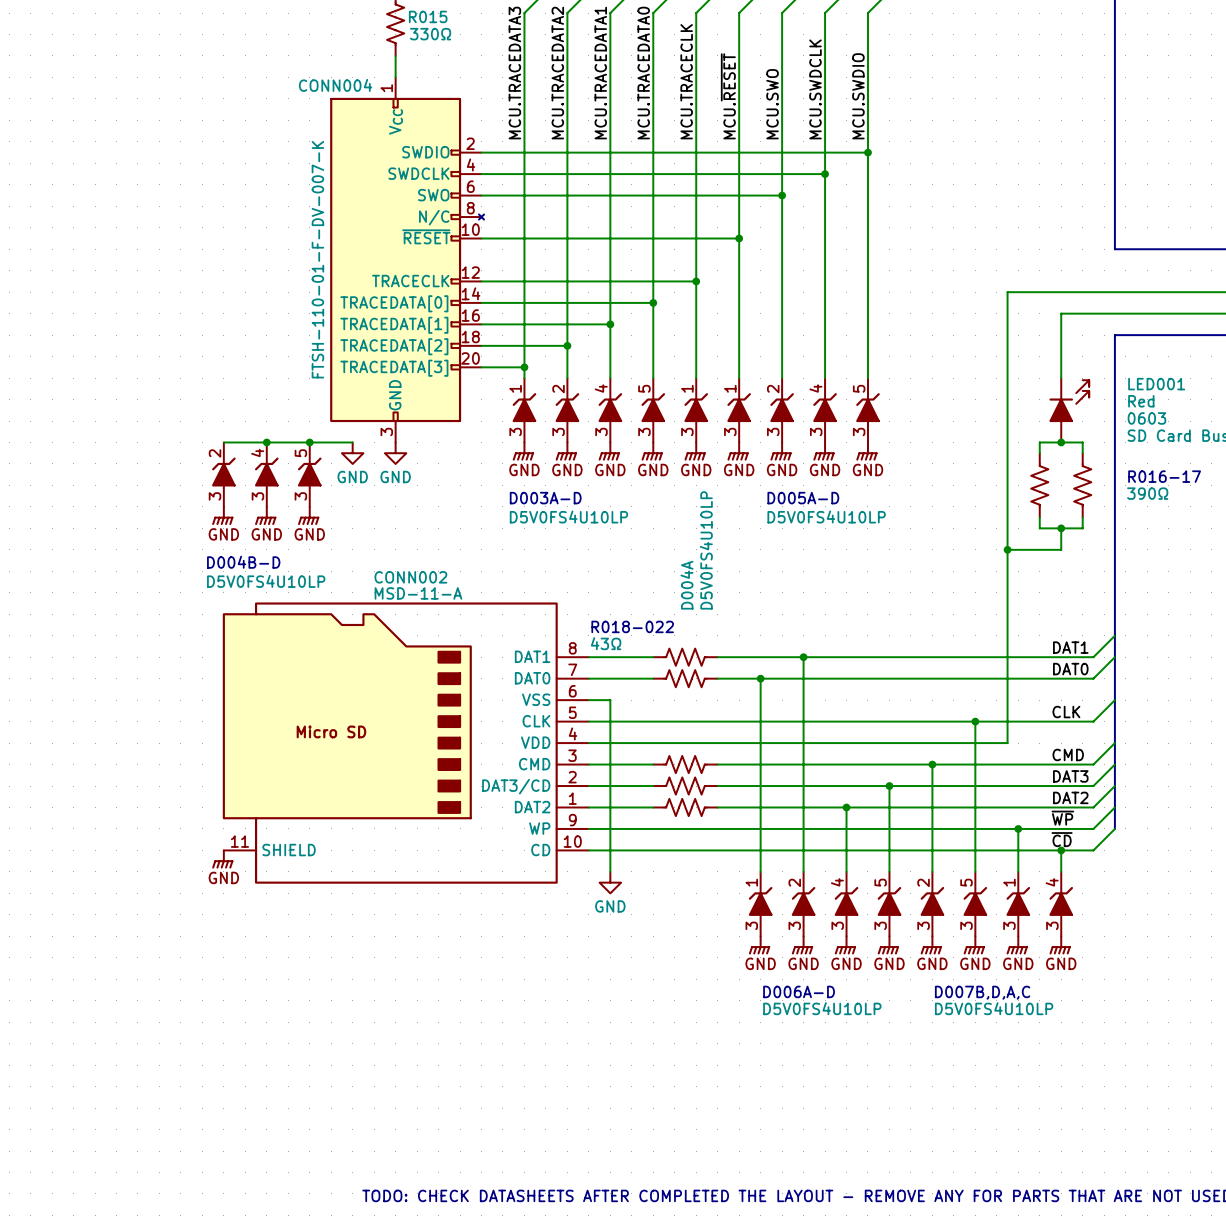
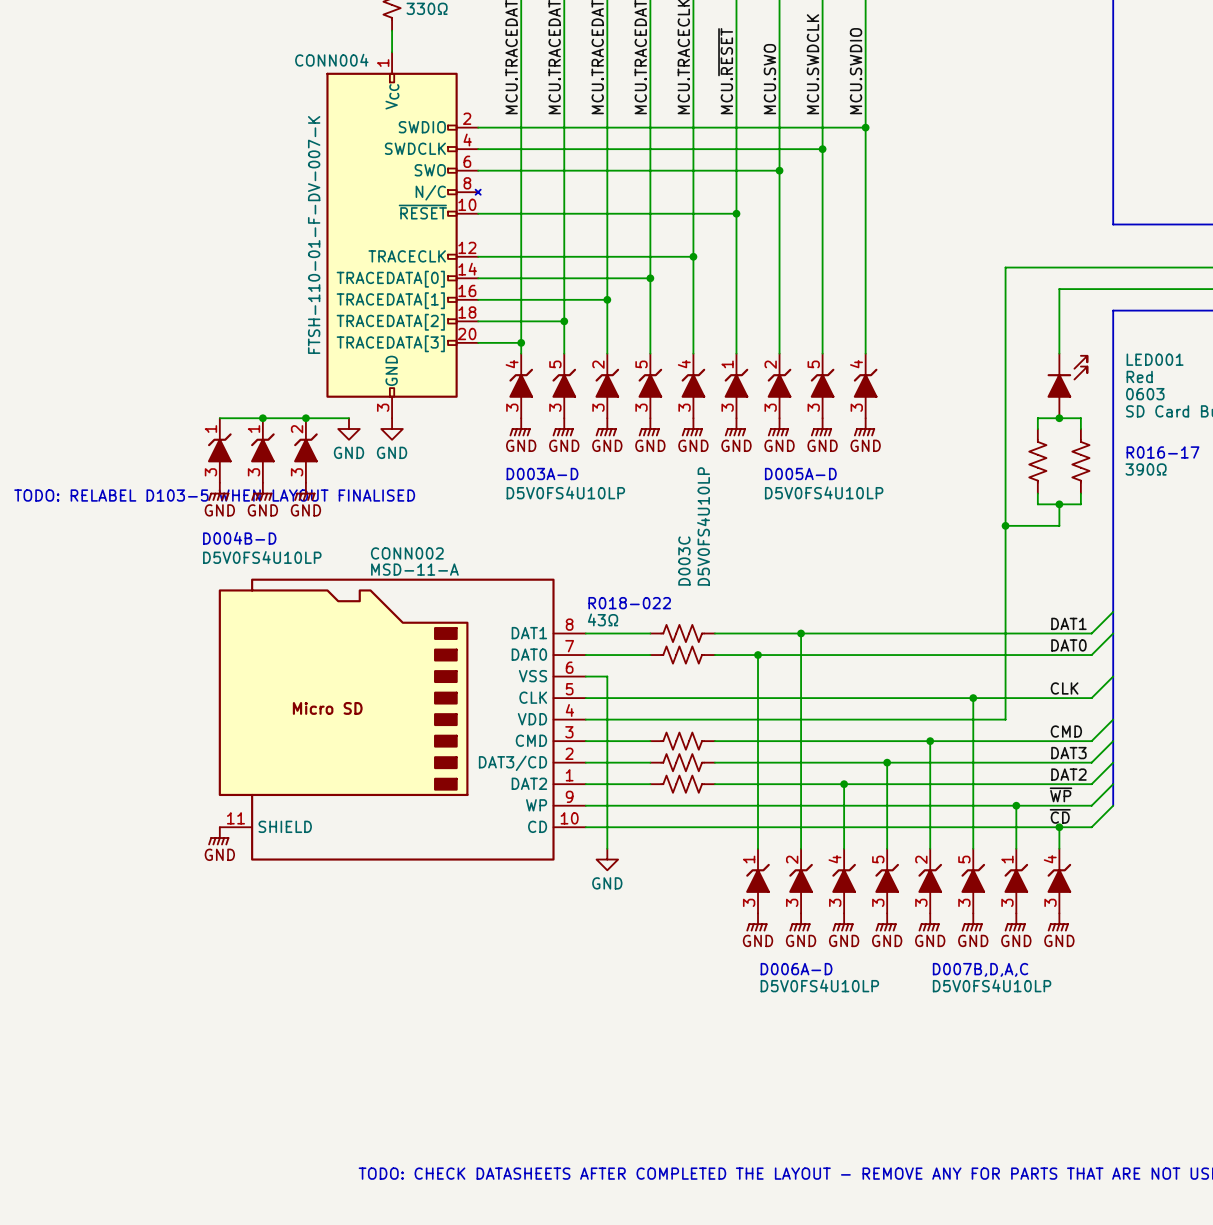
part pin number: 1 (515, 388) -> 4 (512, 364)
part pin number: 4 (601, 388) -> 2 (598, 364)
D004A pin number: 1 (687, 388) -> 4 (684, 364)
part pin number: 4 (815, 388) -> 5 (813, 364)
part pin number: 5 (859, 388) -> 4 (856, 364)
part pin number: 2 (558, 389) -> 5 (555, 364)
part pin number: 4 (257, 452) -> 1 (254, 429)
part pin number: 2 (215, 453) -> 1 (210, 429)
part pin number: 5 (300, 453) -> 2 (297, 429)
text: none -> TODO: RELABEL D103-5 WHEN LAYOUT FINALISED (214, 495)
D004A name: D004A (686, 585) -> D003C (684, 561)

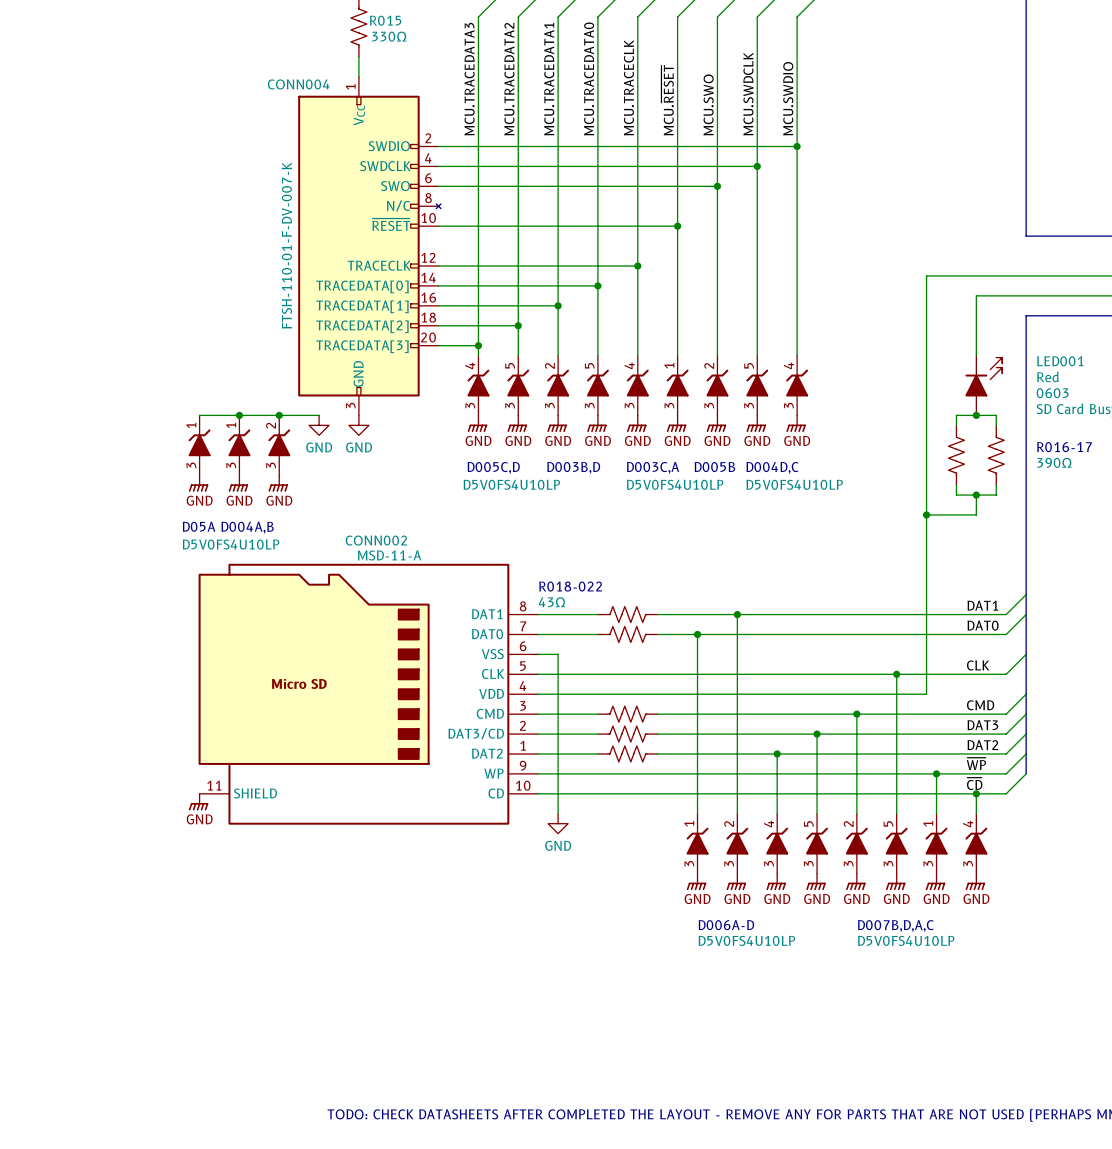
text: D003A-D (542, 473) -> D005C,D (493, 467)
text: D005A-D (800, 473) -> D005B (714, 467)
text: none -> D003B,D (573, 467)
text: none -> D003C,A (653, 467)
text: none -> D004D,C (772, 467)
part value position: D5V0FS4U10LP (824, 492) -> D5V0FS4U10LP (794, 484)
text: TODO: RELABEL D103-5 WHEN LAYOUT FINALISED (214, 495) -> none
D003C value rotation: 0° (703, 526) -> 90° clockwise (675, 484)
text: D004B-D (239, 538) -> D05A D004A,B (228, 527)
D003C name: D003C (684, 561) -> none

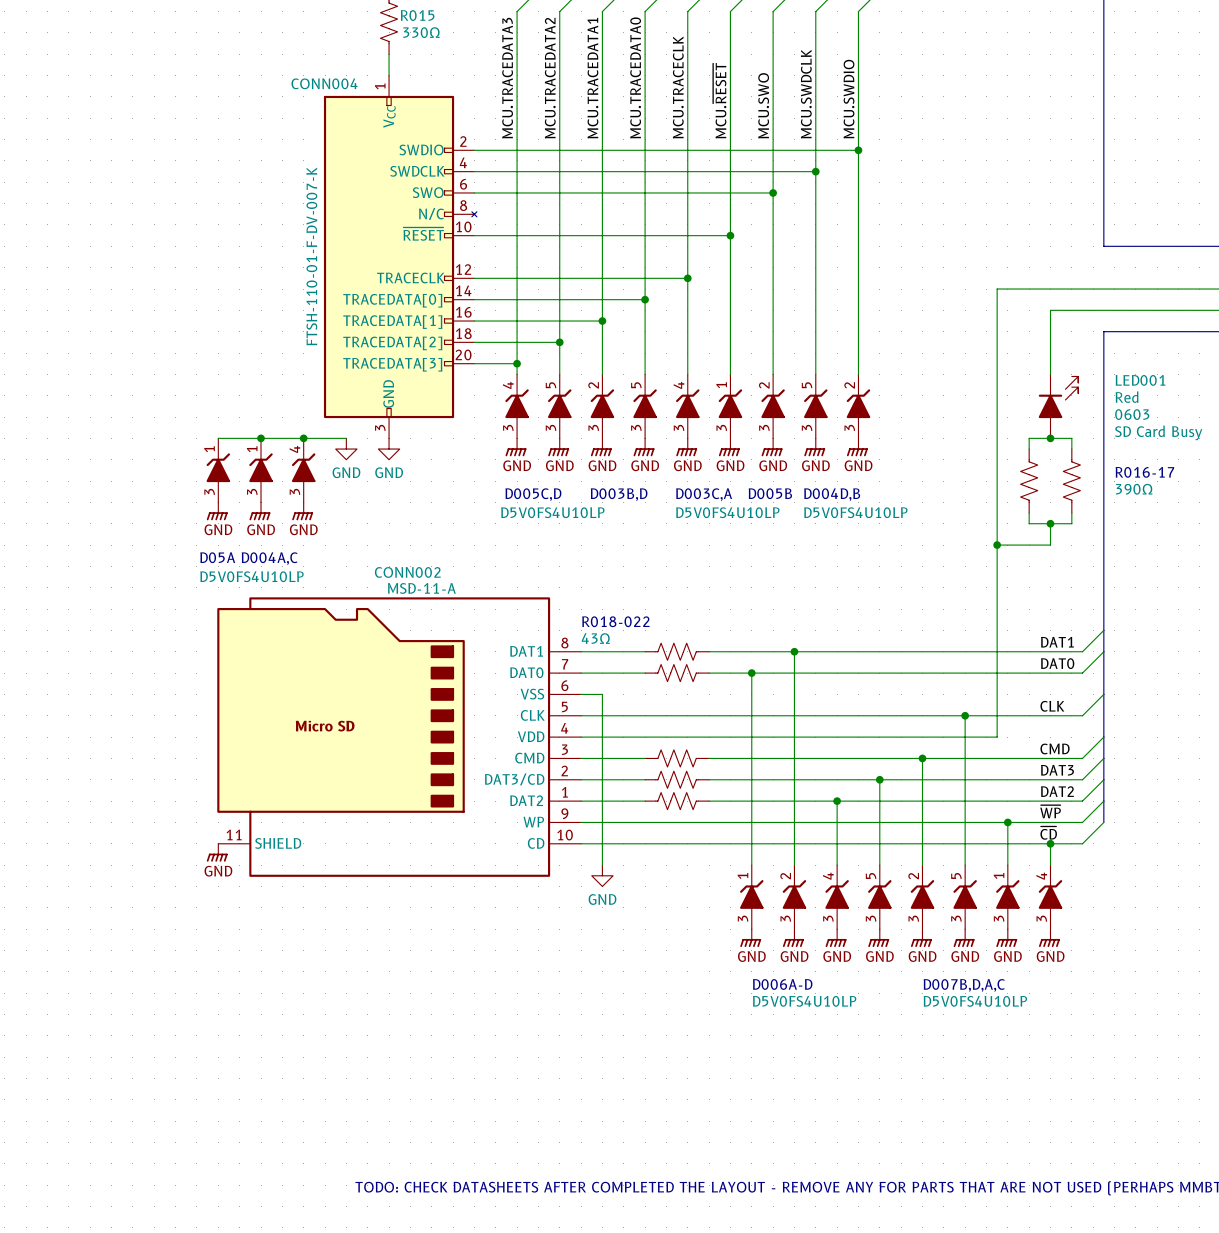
part pin number: 4 (788, 365) -> 2 (849, 385)
part pin number: 2 (271, 425) -> 4 (294, 449)
text: D004D,C (772, 467) -> D004D,B (832, 494)
text: D05A D004A,B (228, 527) -> D05A D004A,C (248, 558)

